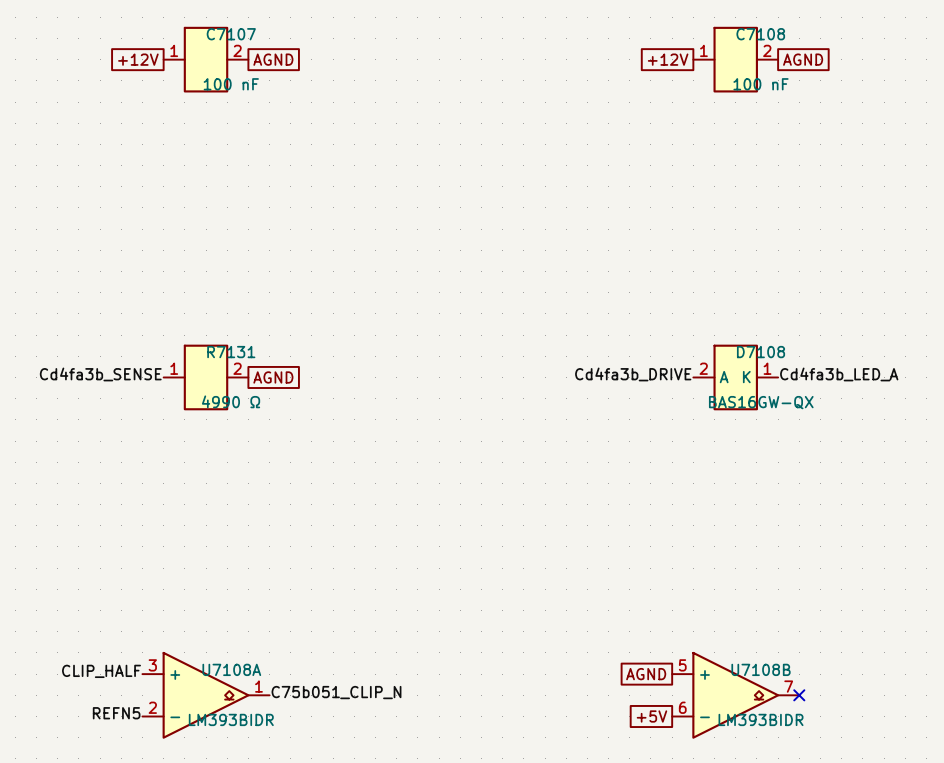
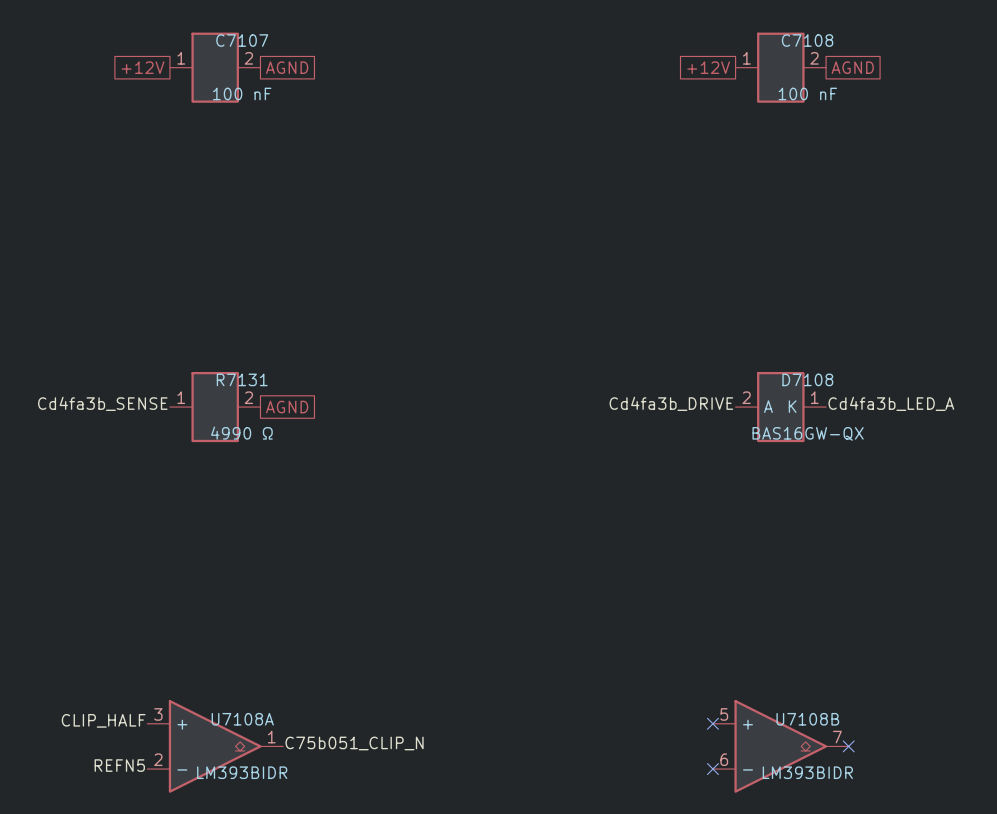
global label: AGND (646, 674) -> none
no-connect mark: none -> (712, 723)
global label: +5V (651, 716) -> none
no-connect mark: none -> (712, 769)

